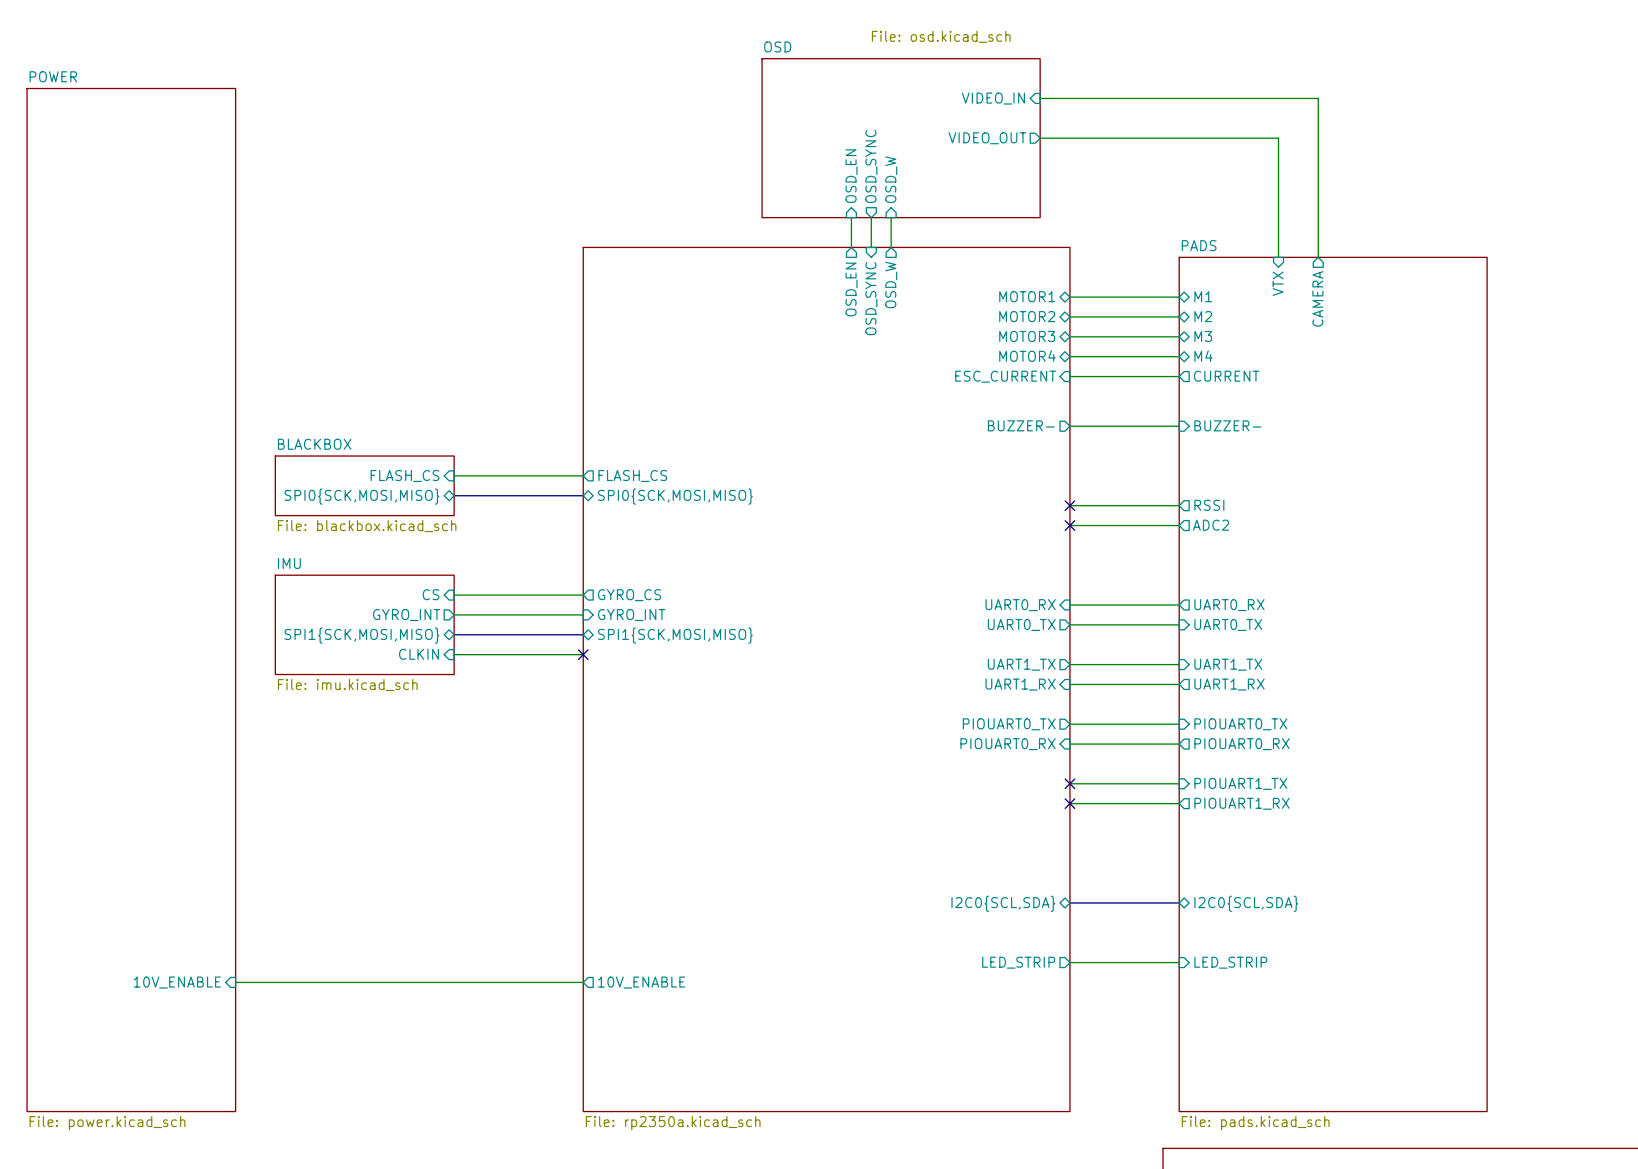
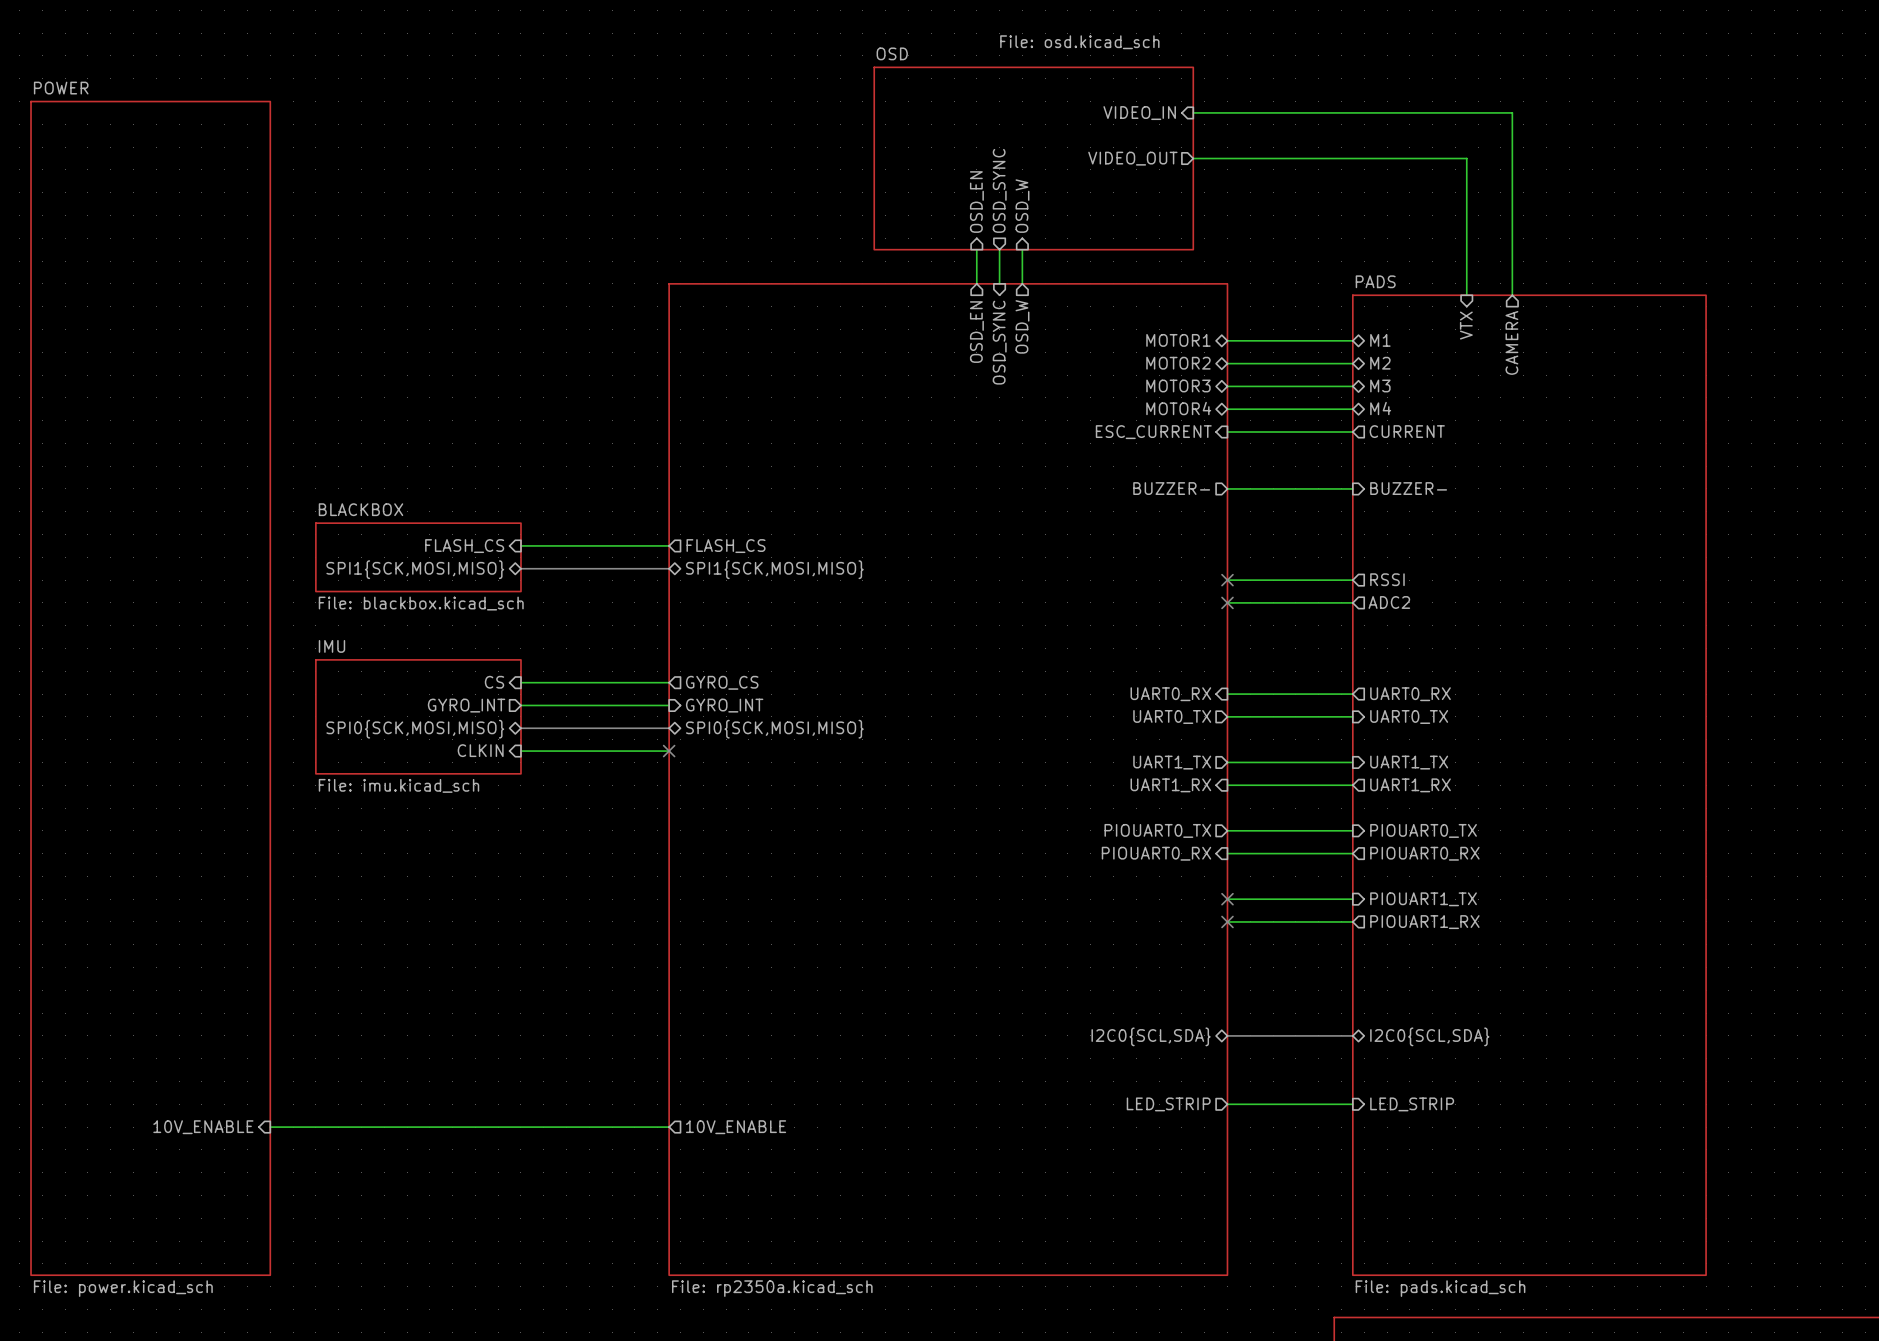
sheet pin: SPI0{SCK,MOSI,MISO} (361, 496) -> SPI1{SCK,MOSI,MISO} (415, 569)
sheet pin: SPI0{SCK,MOSI,MISO} (675, 496) -> SPI1{SCK,MOSI,MISO} (774, 569)
sheet pin: SPI1{SCK,MOSI,MISO} (361, 635) -> SPI0{SCK,MOSI,MISO} (415, 729)
sheet pin: SPI1{SCK,MOSI,MISO} (675, 635) -> SPI0{SCK,MOSI,MISO} (774, 729)

